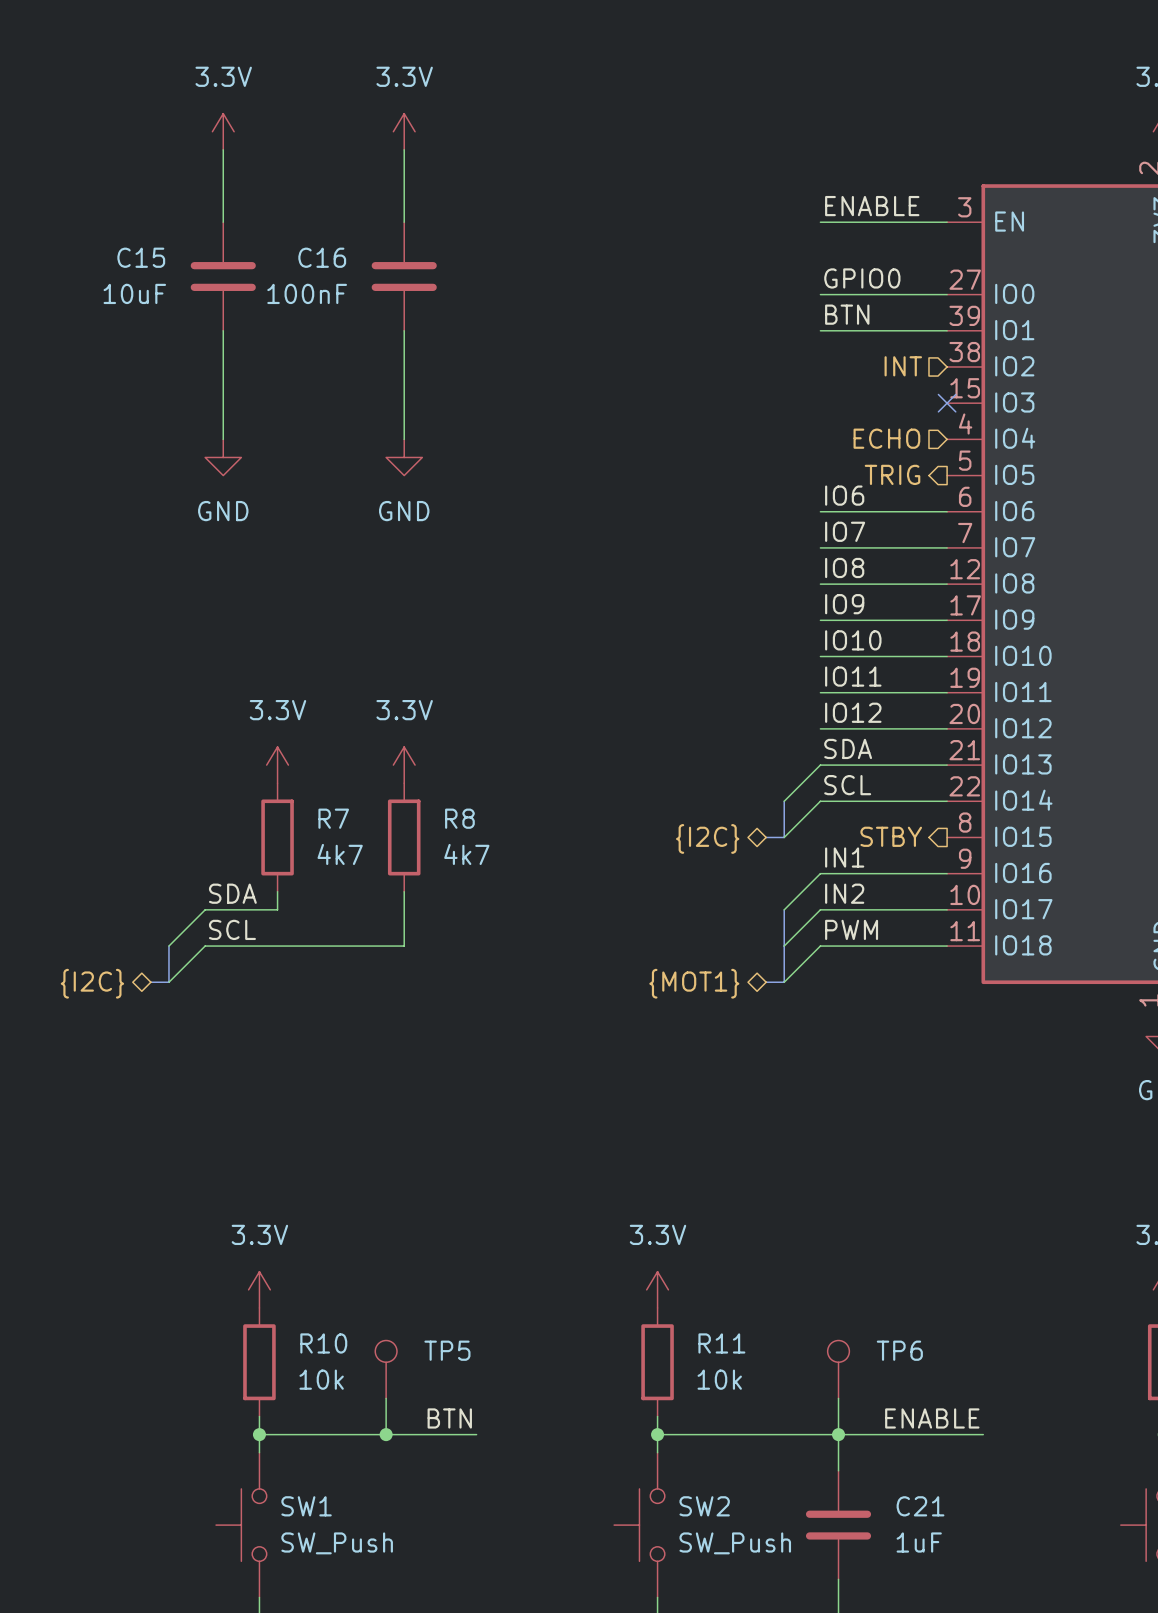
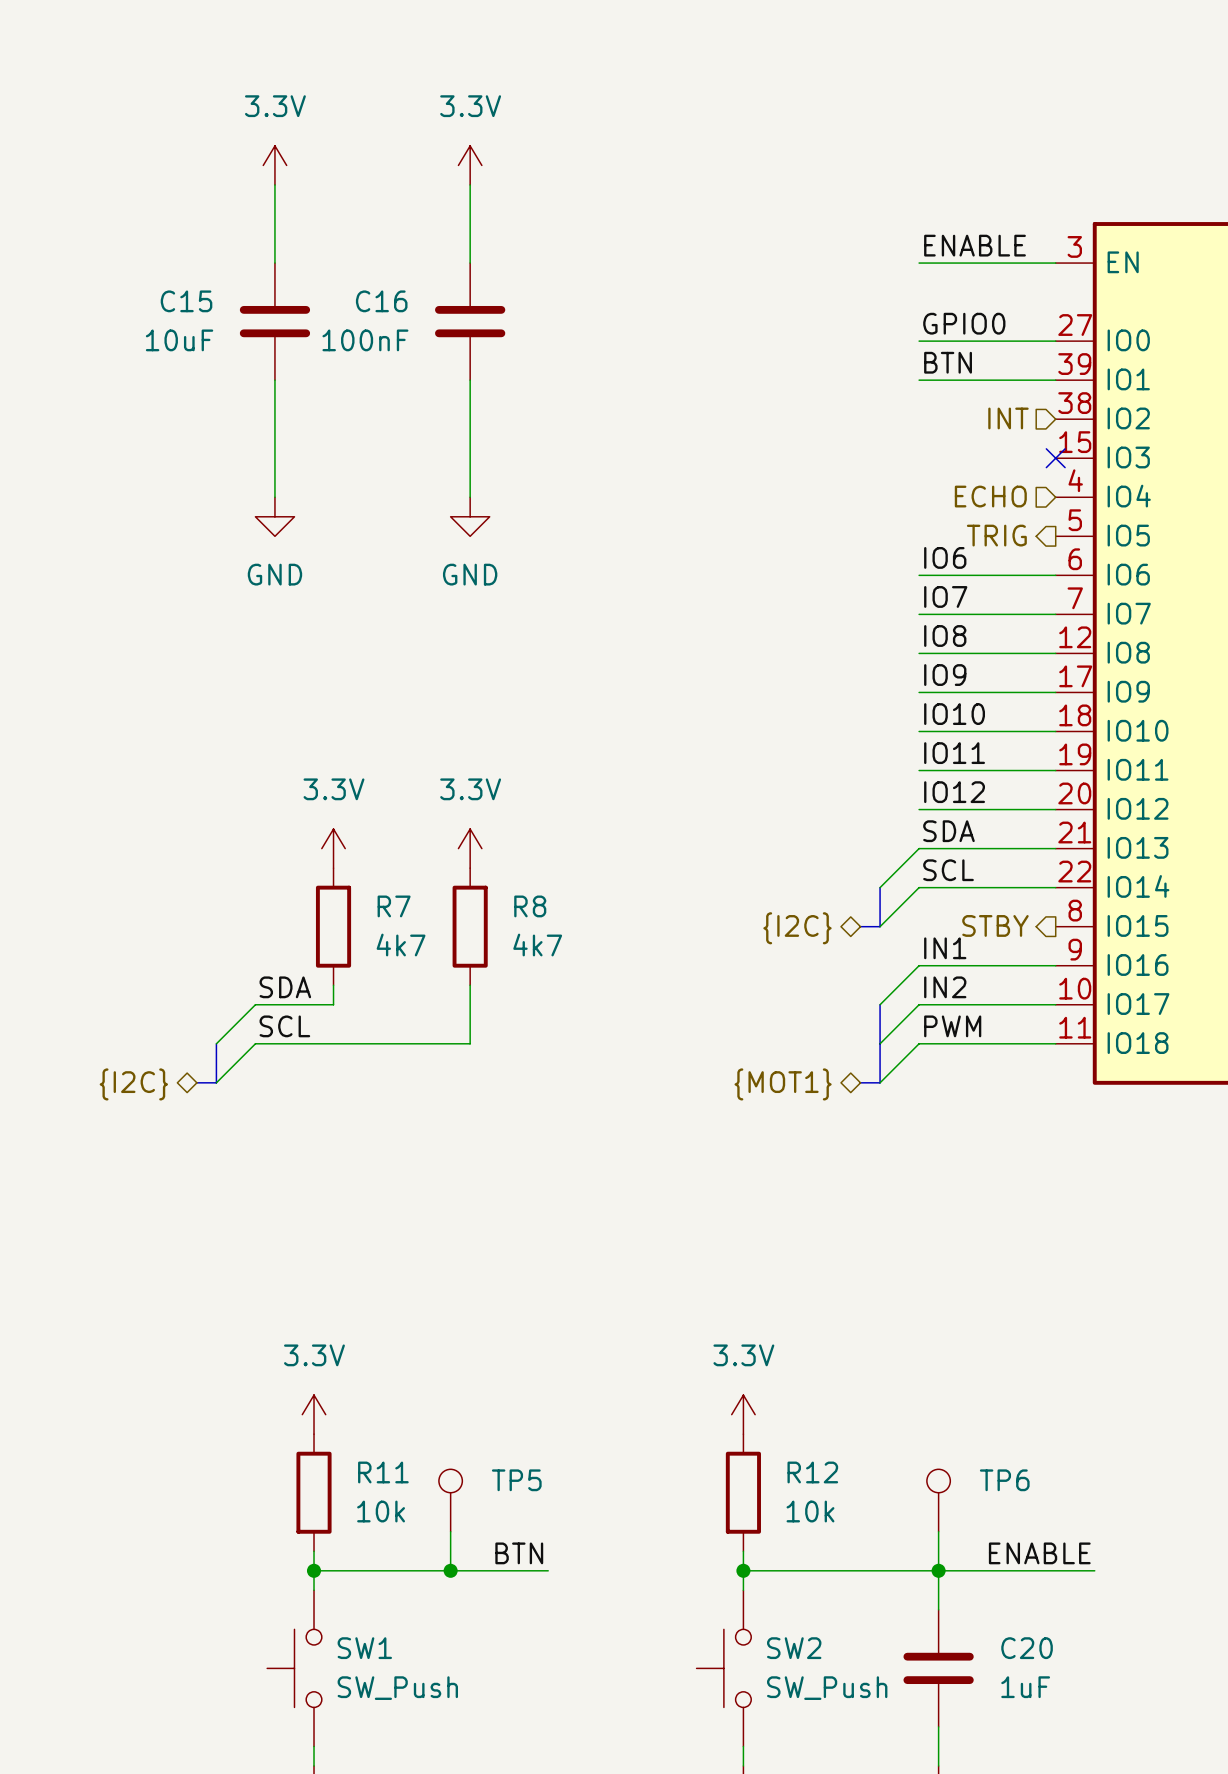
R10 name: R10 (323, 1343) -> R11 (383, 1472)
R11 name: R11 (721, 1343) -> R12 (812, 1472)
C21 name: C21 (920, 1506) -> C20 (1027, 1648)

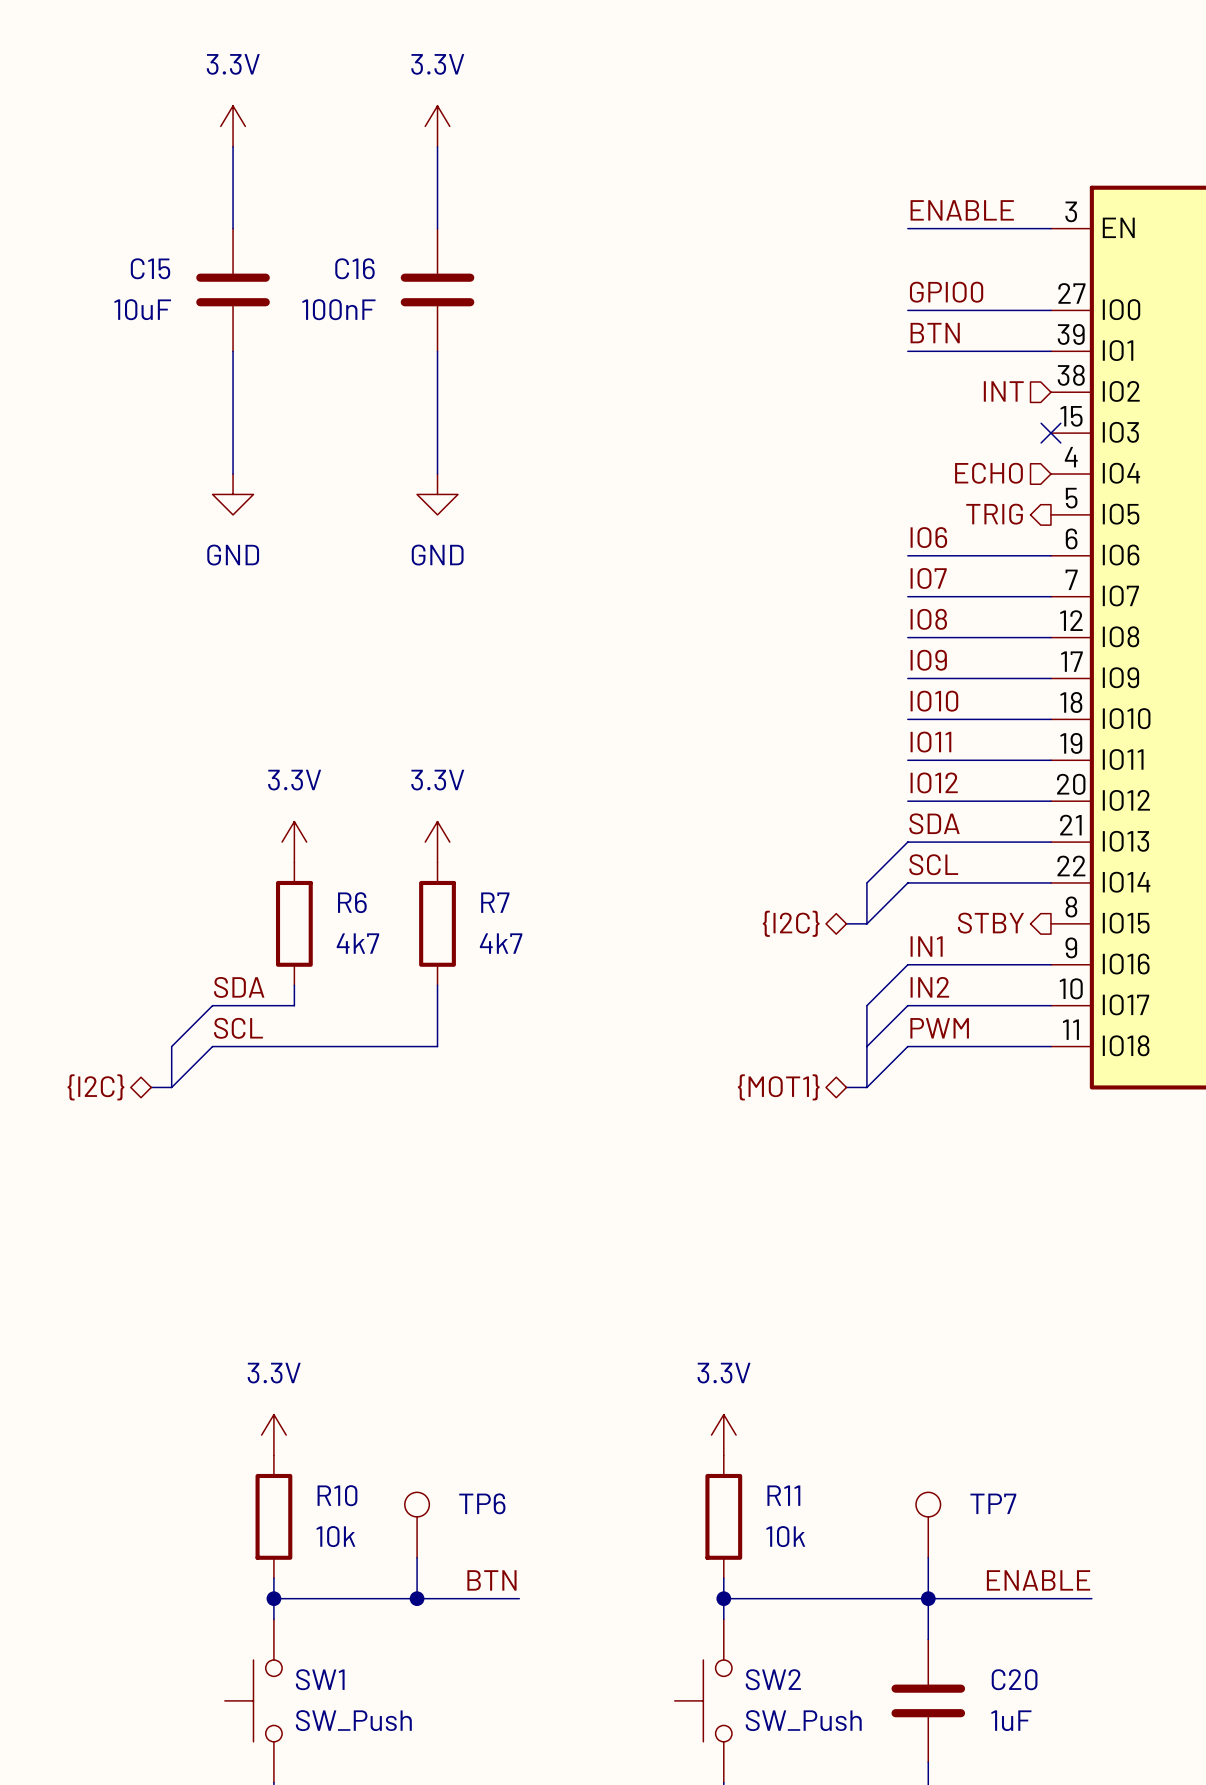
R7 name: R7 (394, 906) -> R6 (352, 902)
R8 name: R8 (530, 906) -> R7 (495, 902)
R11 name: R11 (383, 1472) -> R10 (337, 1495)
R12 name: R12 (812, 1472) -> R11 (783, 1495)
TP5 name: TP5 (516, 1480) -> TP6 (482, 1503)
TP6 name: TP6 (1004, 1480) -> TP7 (993, 1503)

